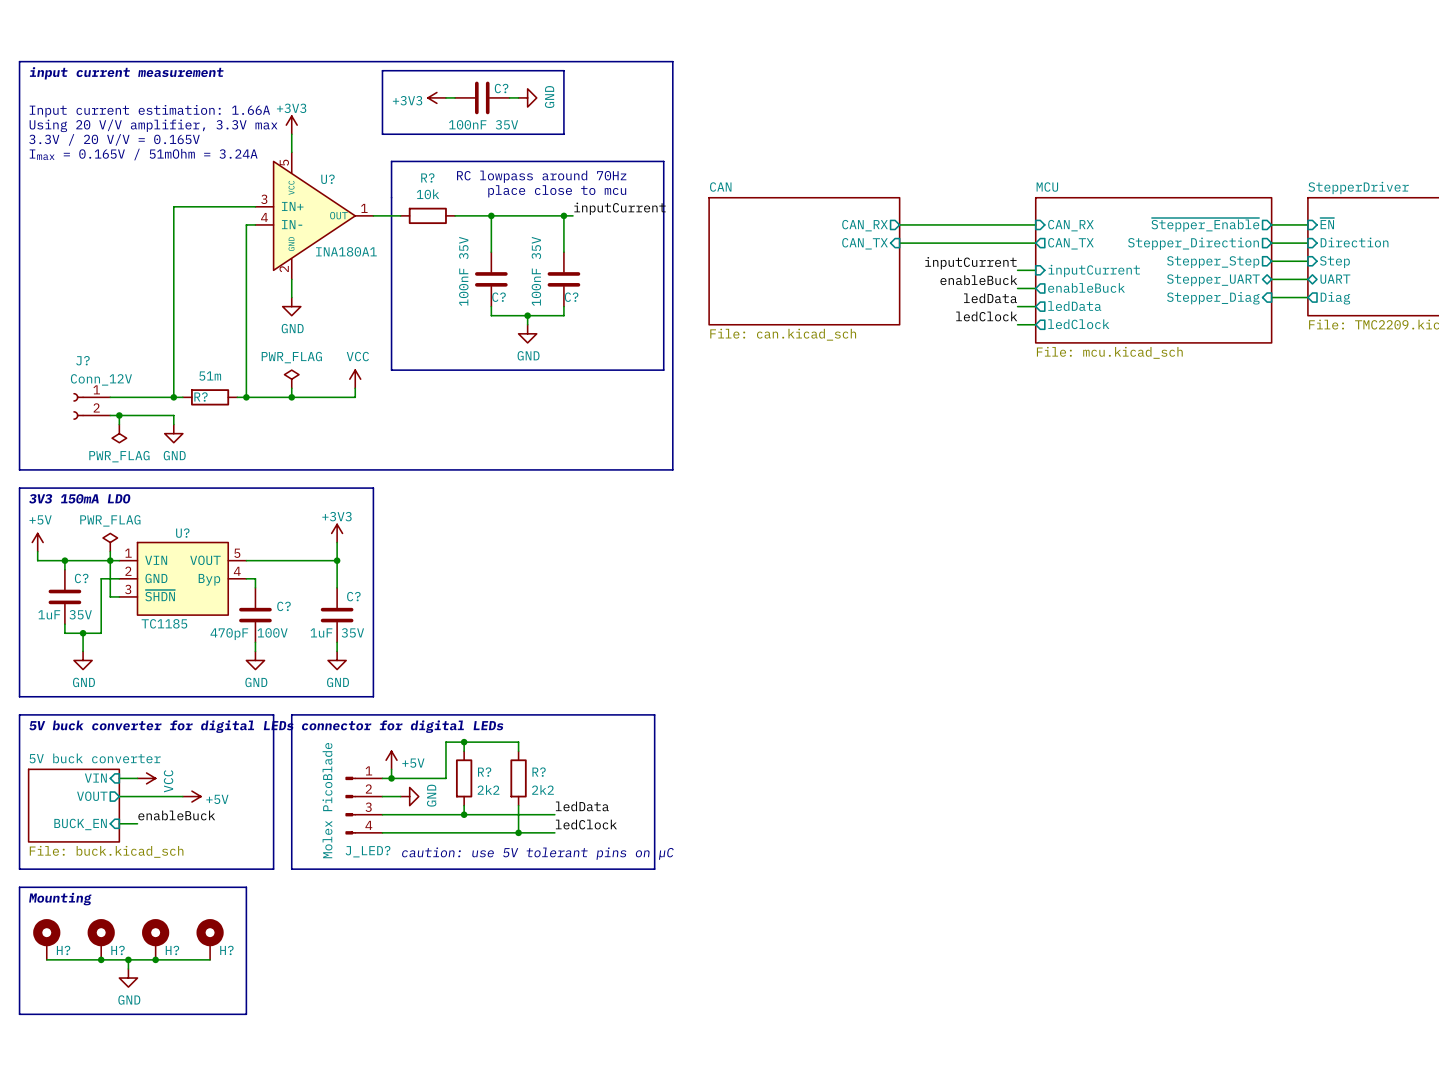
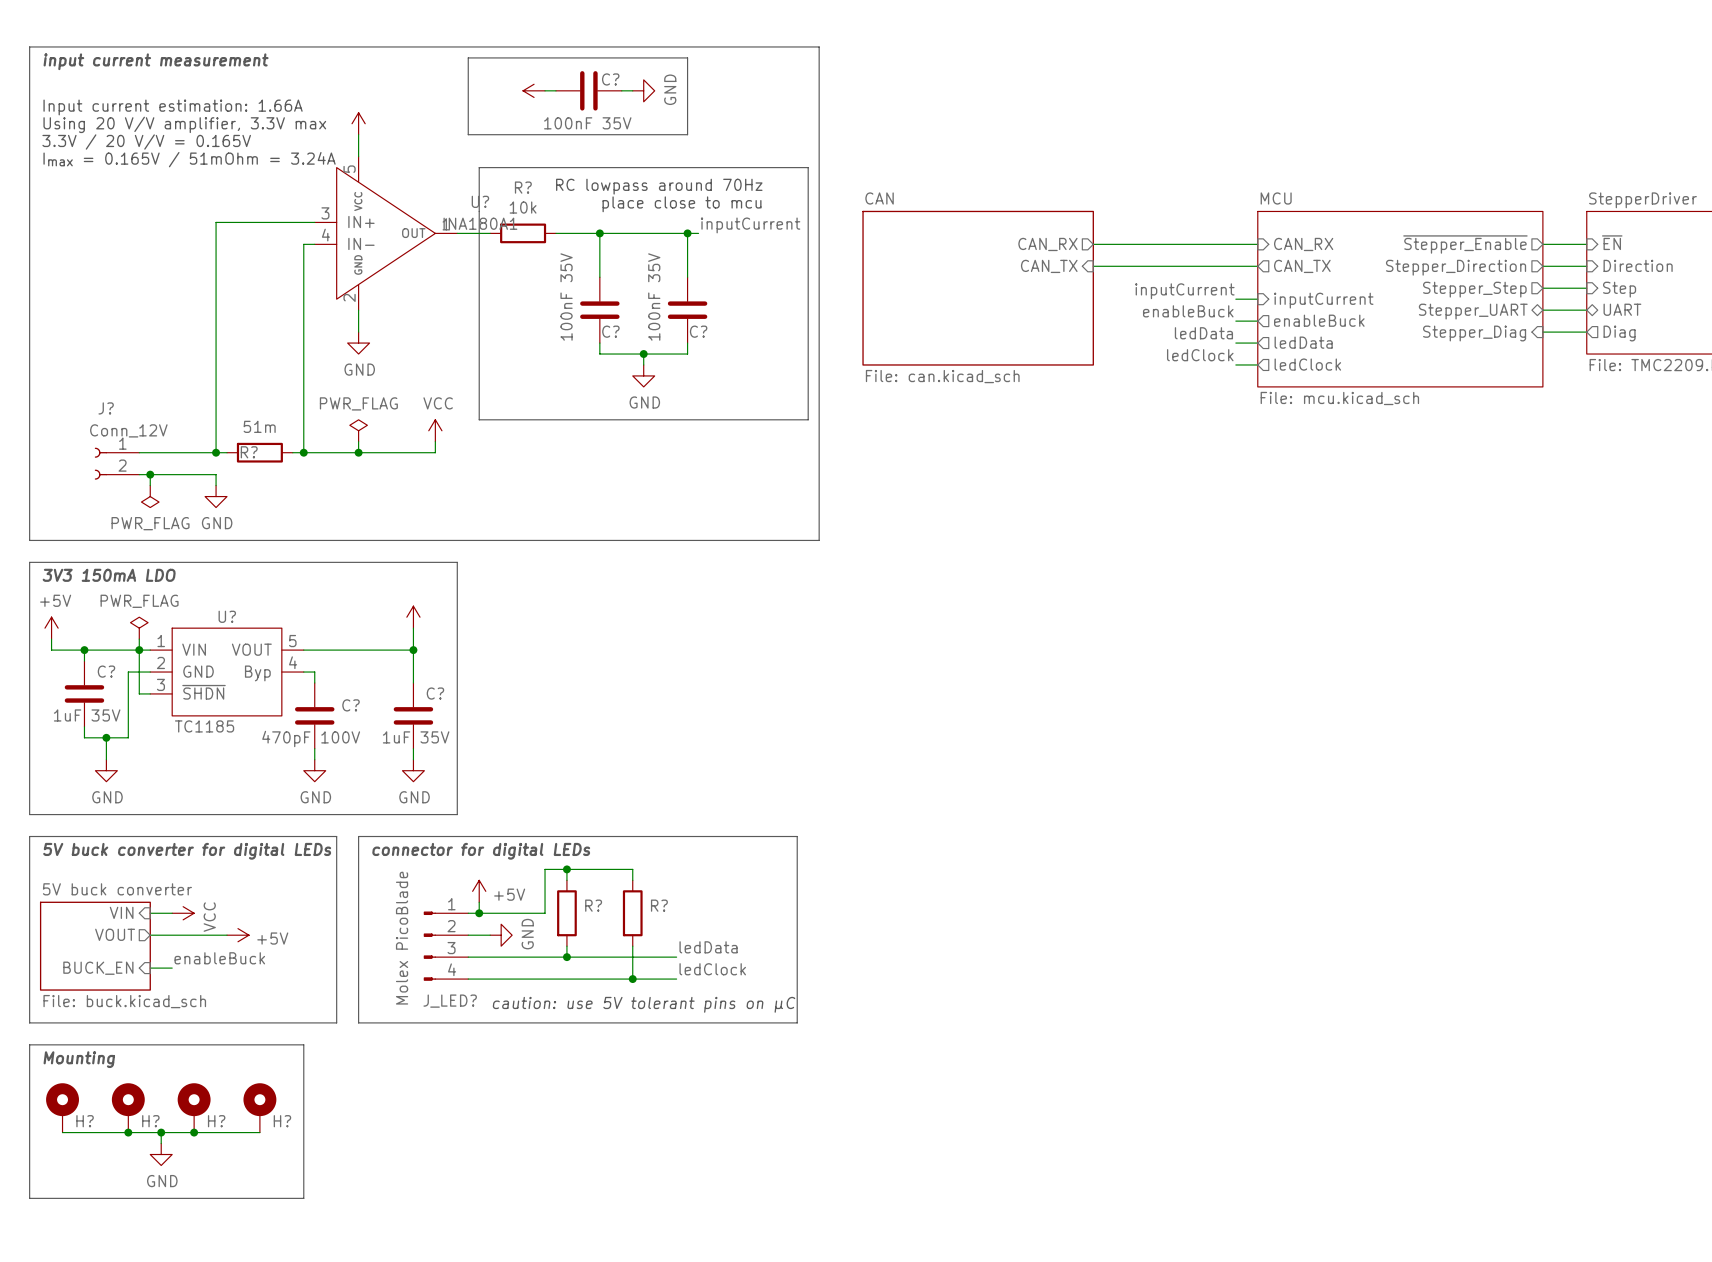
power symbol text: +3V3 (407, 100) -> none
power symbol text: +3V3 (291, 108) -> none
U? name position: U? (327, 179) -> U? (480, 201)
U? value position: INA180A1 (346, 251) -> INA180A1 (480, 223)
power symbol text: +3V3 (336, 516) -> none
R? value: 2k2 (488, 789) -> none
R? value: 2k2 (542, 789) -> none

